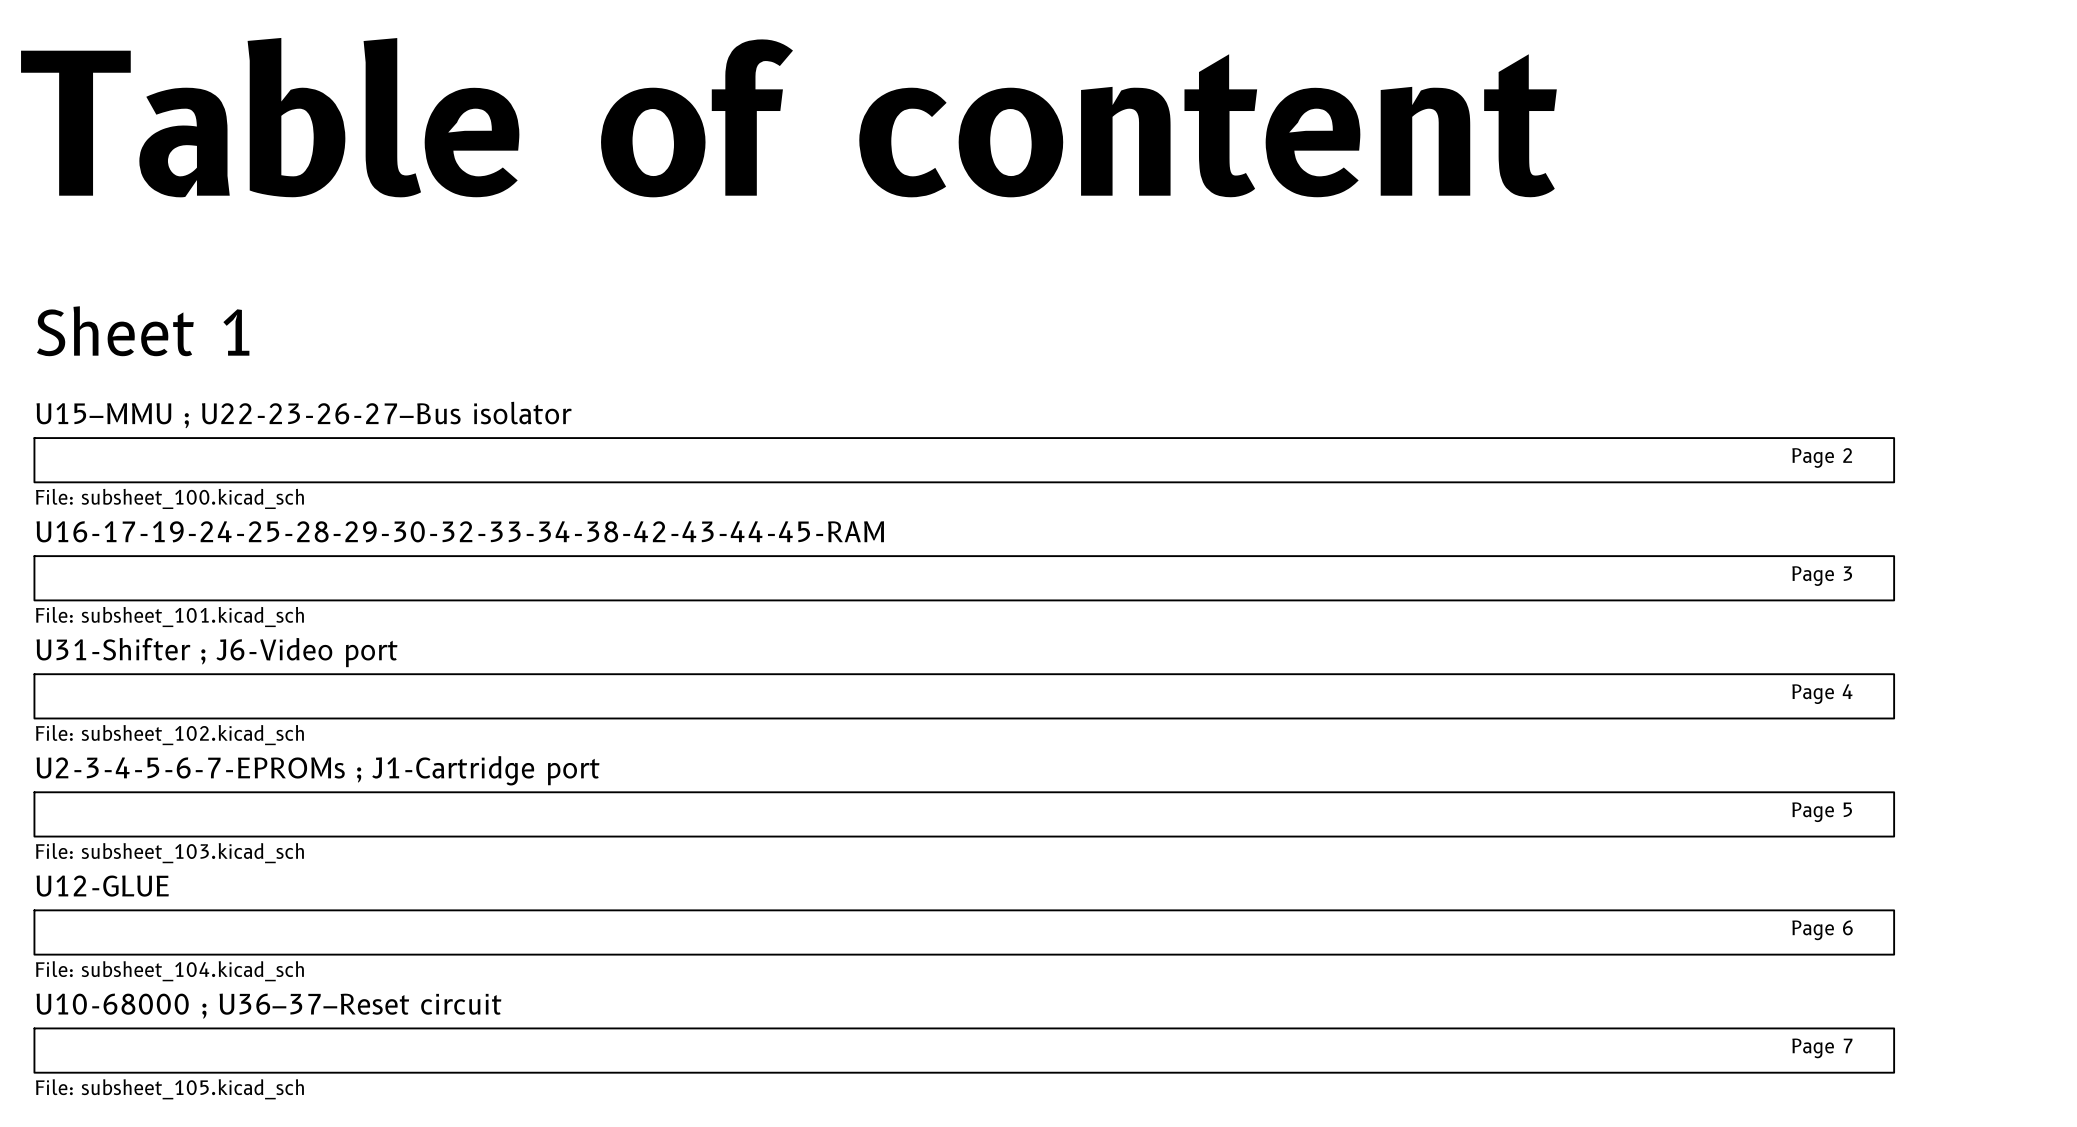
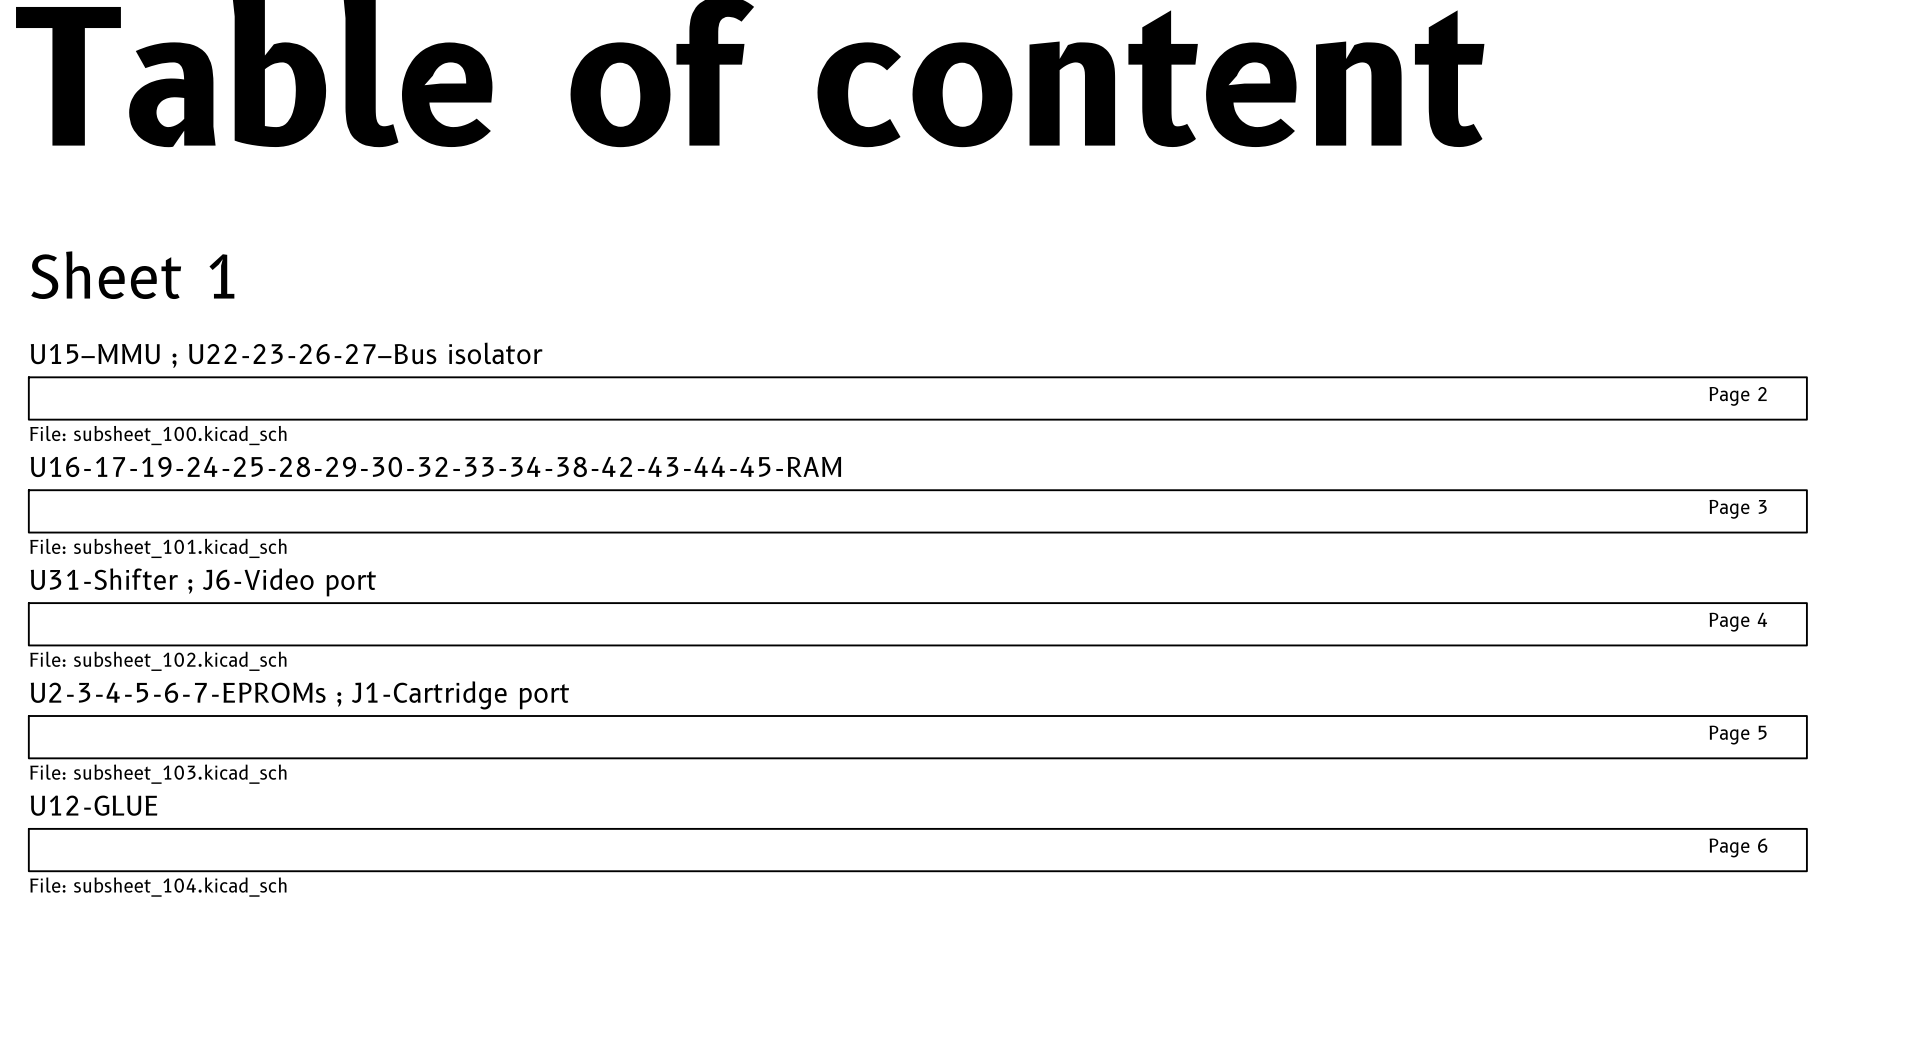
text: Page 7 (1822, 1048) -> none
sheet U10-68000 ; U36–37–Reset circuit: File: subsheet_105.kicad_sch (964, 1050) -> none

